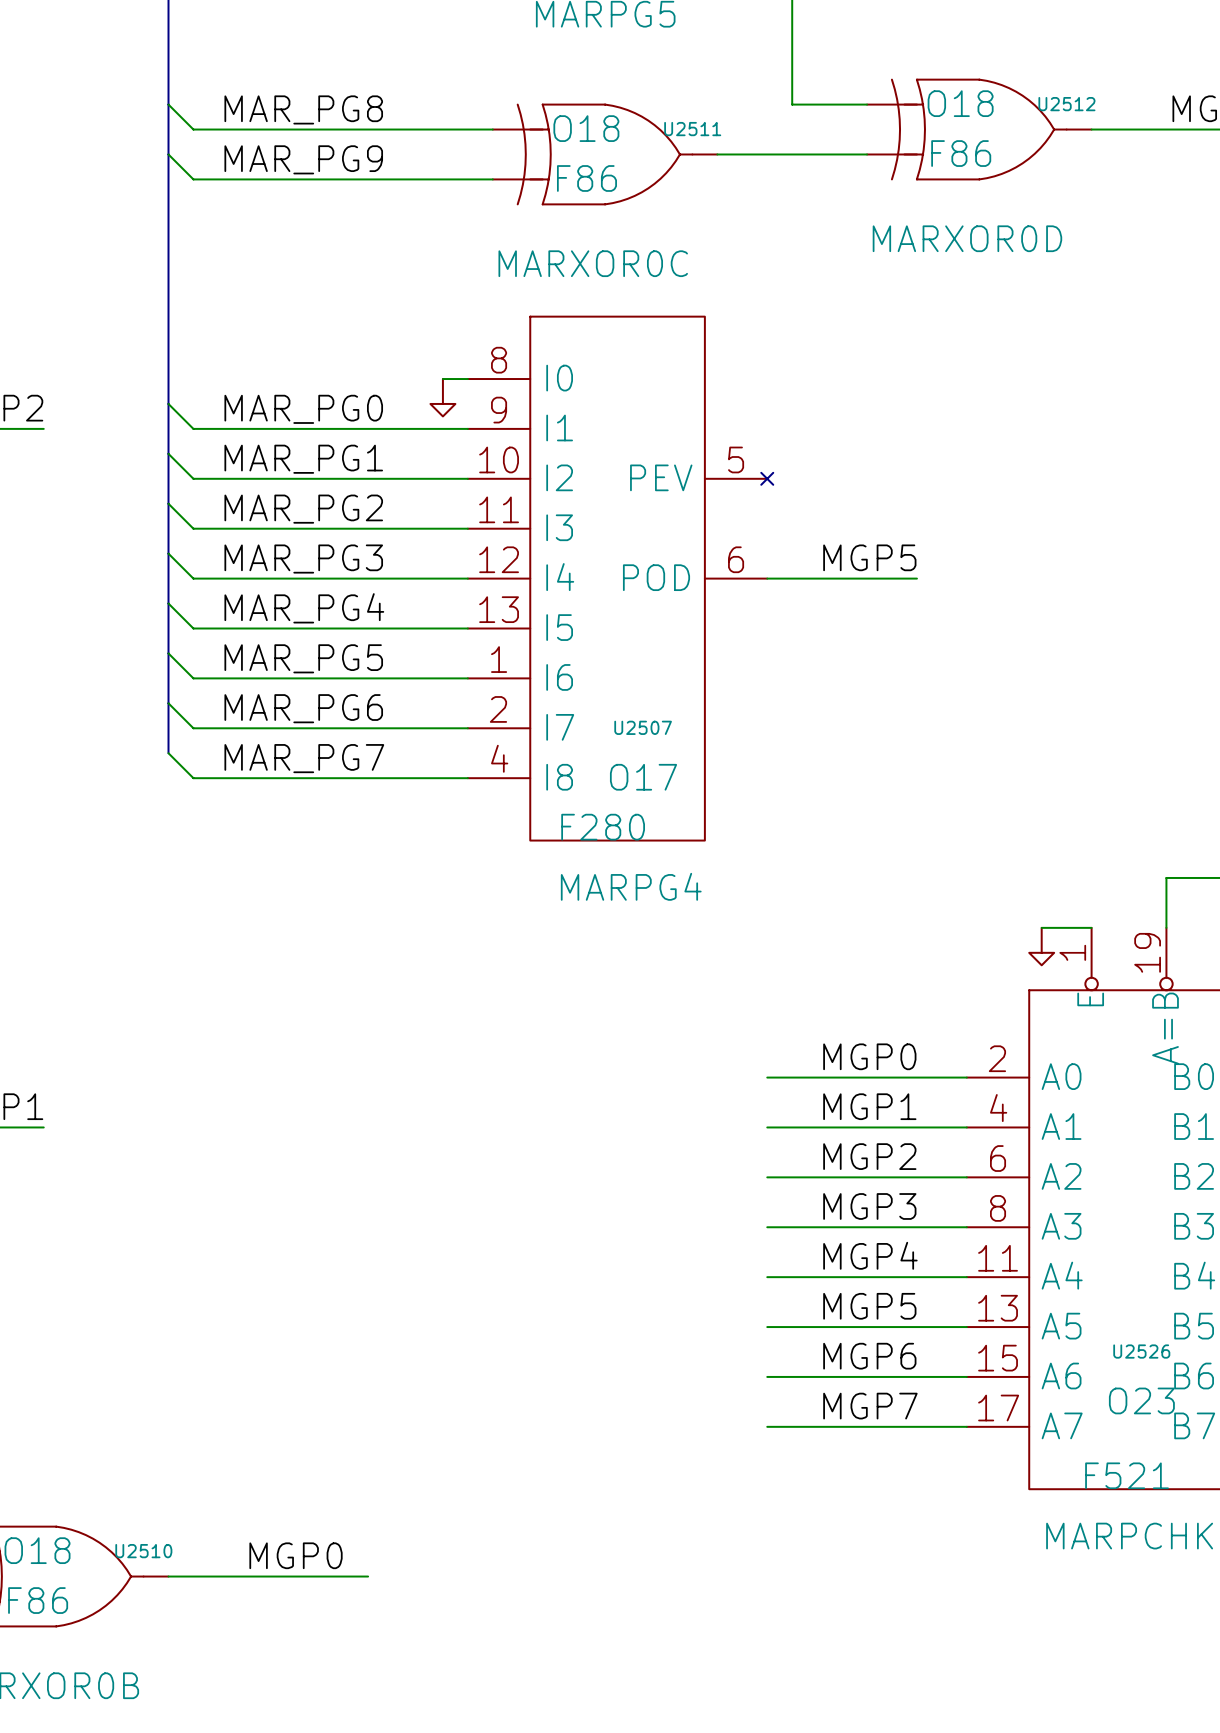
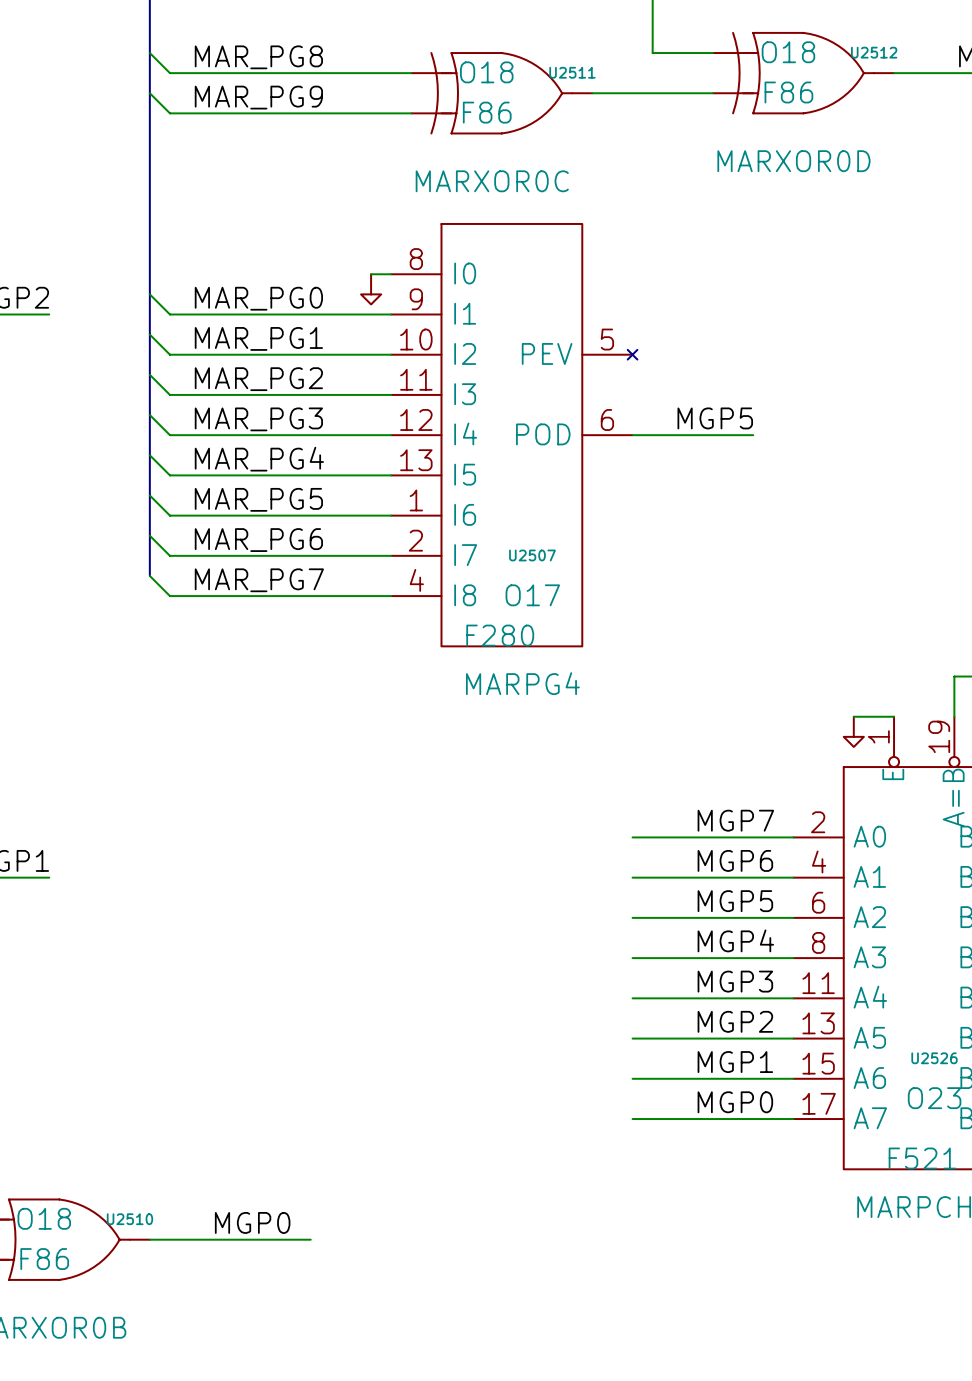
label: MGP0 (869, 1056) -> MGP7 (735, 820)
label: MGP1 (869, 1106) -> MGP6 (735, 860)
label position: MGP2 (869, 1156) -> MGP2 (735, 1021)
label position: MGP3 (869, 1206) -> MGP3 (735, 981)
label position: MGP4 (870, 1255) -> MGP4 (735, 940)
label position: MGP5 (869, 1306) -> MGP5 (735, 901)
label: MGP6 (869, 1356) -> MGP1 (735, 1062)
label: MGP7 (870, 1406) -> MGP0 (735, 1102)

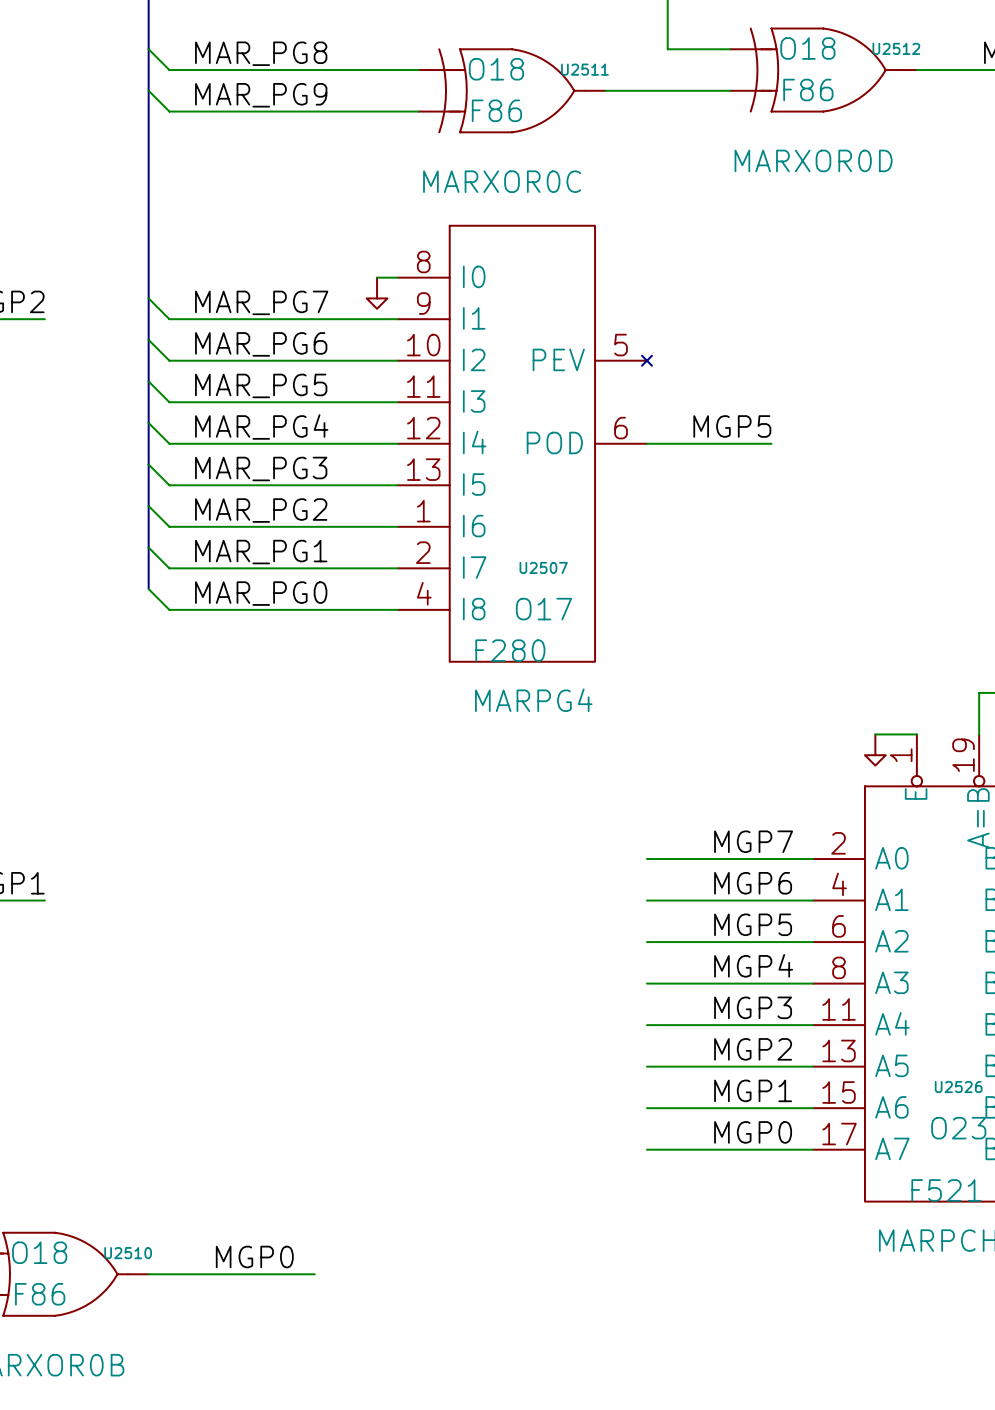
label: MAR_PG0 (258, 298) -> MAR_PG7 (261, 302)
label: MAR_PG1 (258, 338) -> MAR_PG6 (261, 344)
label: MAR_PG2 (258, 379) -> MAR_PG5 (261, 385)
label: MAR_PG3 (258, 419) -> MAR_PG4 (261, 426)
label: MAR_PG4 (259, 459) -> MAR_PG3 (261, 468)
label: MAR_PG5 (258, 499) -> MAR_PG2 (261, 510)
label: MAR_PG6 (258, 540) -> MAR_PG1 (261, 552)
label: MAR_PG7 (259, 580) -> MAR_PG0 (261, 593)

